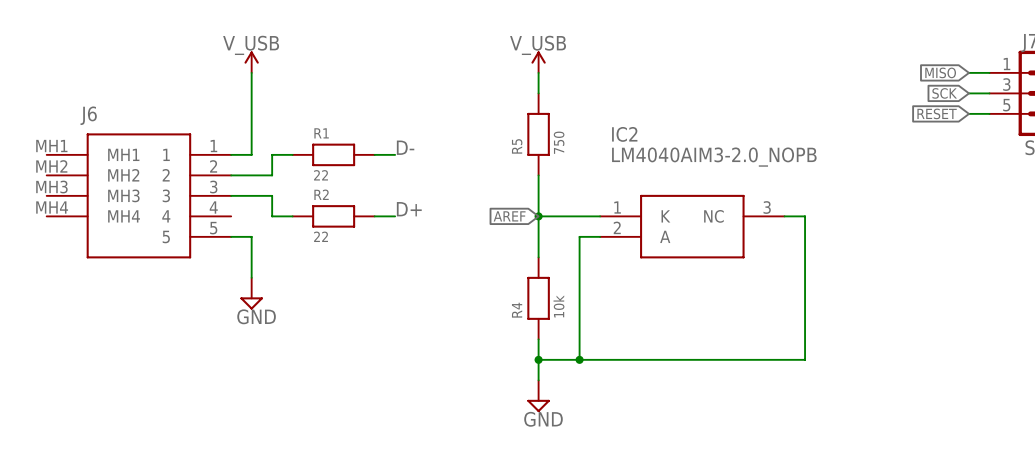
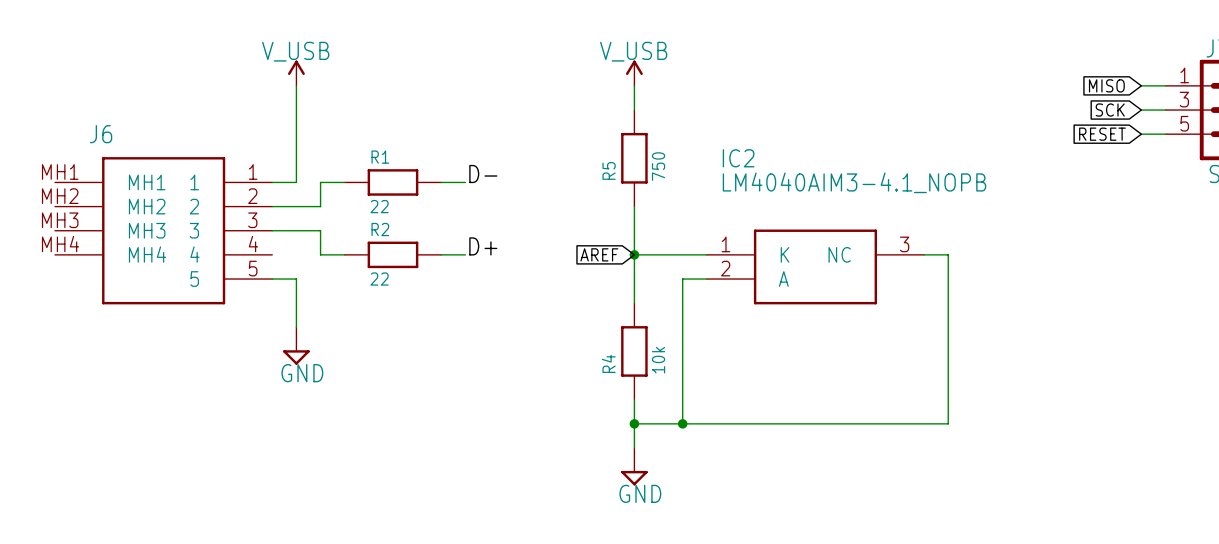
IC2 value: LM4040AIM3-2.0_NOPB (714, 157) -> LM4040AIM3-4.1_NOPB (854, 182)

